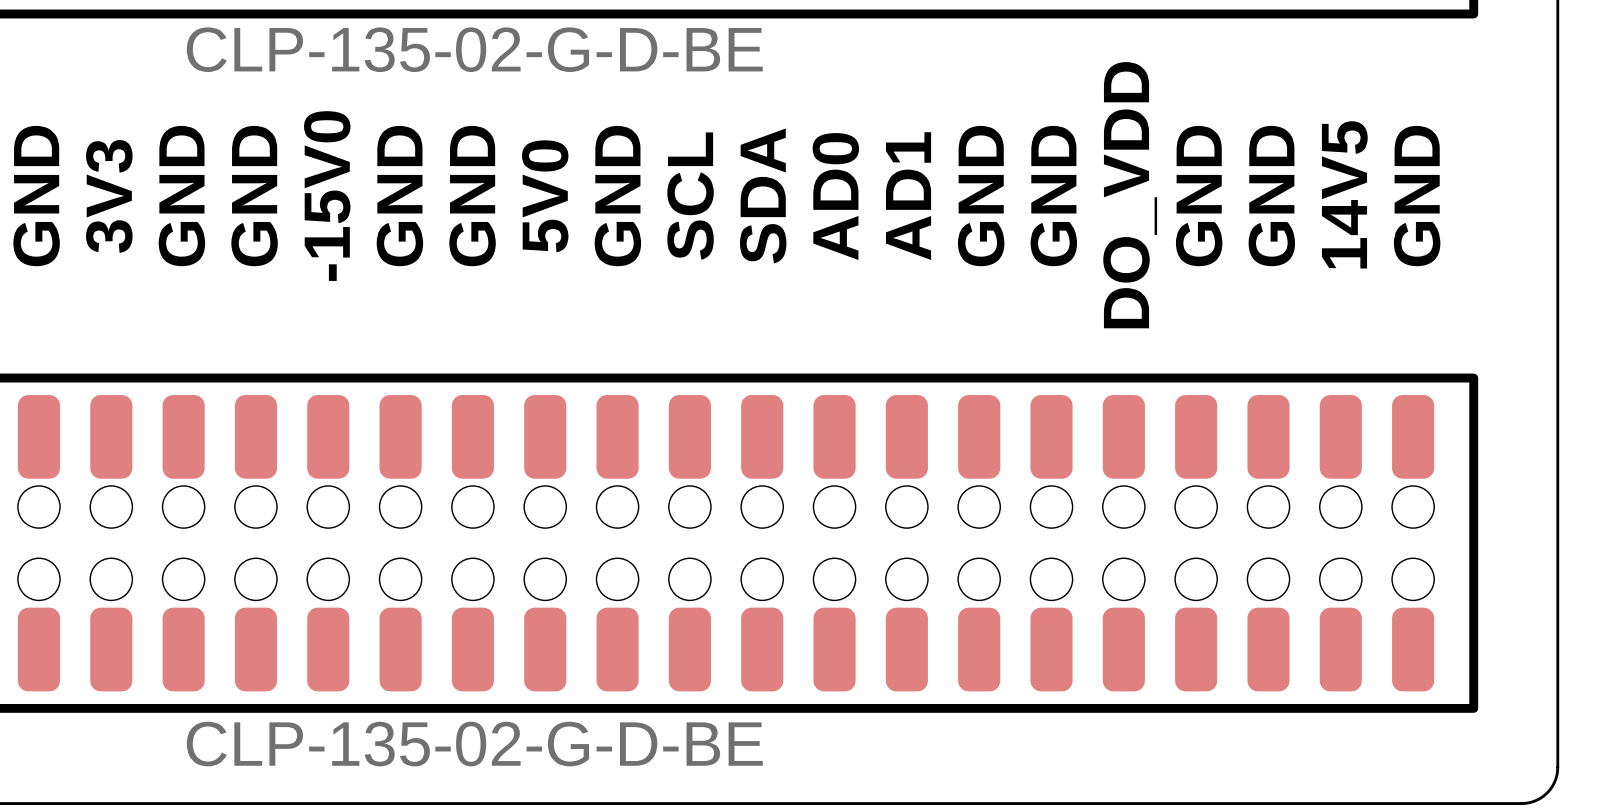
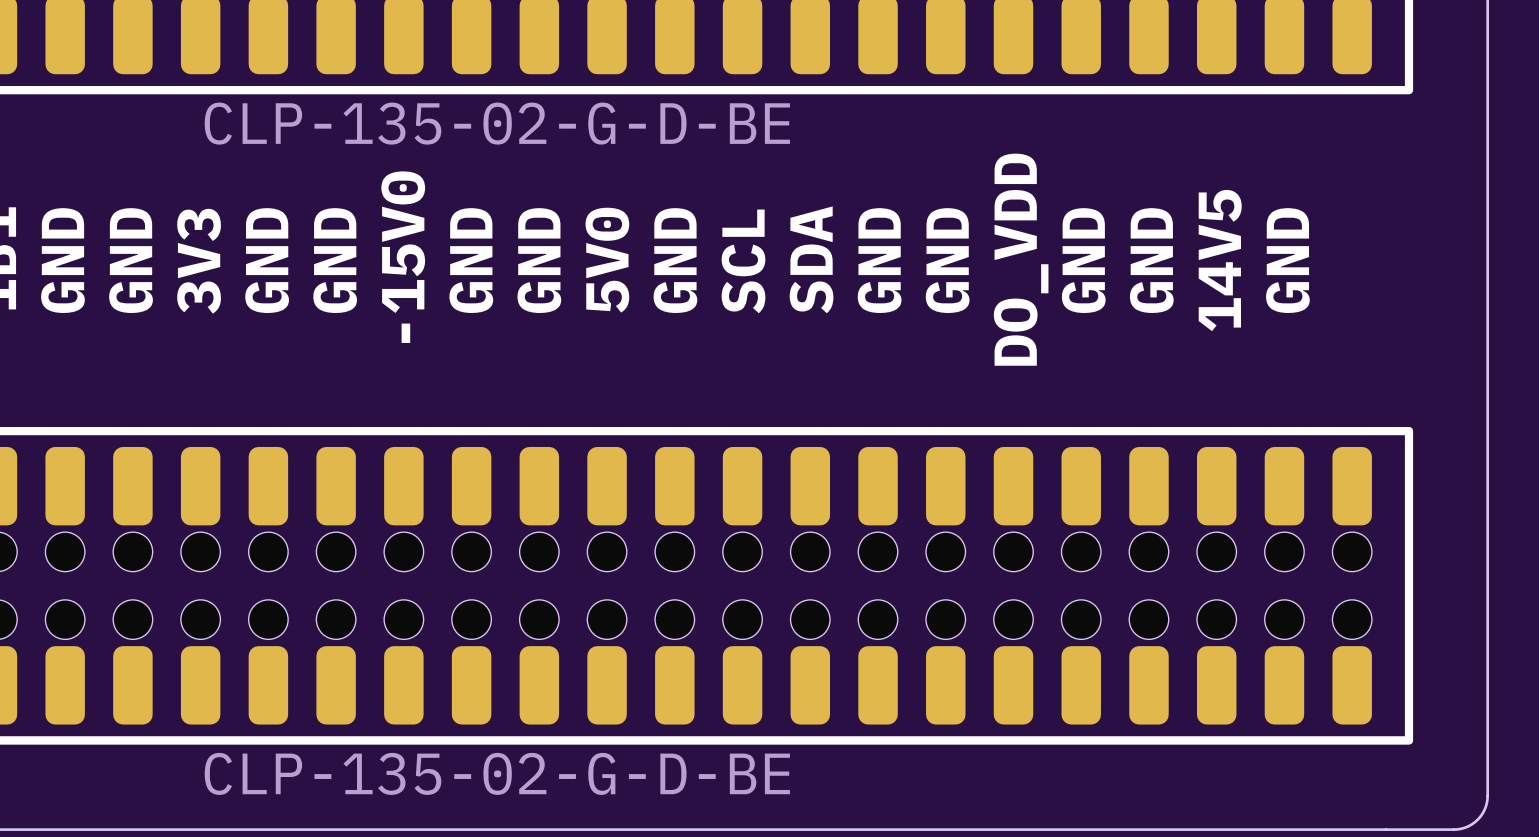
text: 14V5 (1344, 194) -> GND (1287, 260)
text: SDA (763, 195) -> SCL (743, 261)
text: DO_VDD (1130, 195) -> GND (1083, 260)
text: 3V3 (109, 196) -> GND (131, 260)
text: GND (181, 196) -> 3V3 (199, 261)
text: -15V0 (327, 196) -> GND (335, 260)
text: GND (399, 196) -> -15V0 (403, 257)
text: 5V0 (545, 196) -> GND (539, 260)
text: GND (617, 196) -> 5V0 (607, 260)
text: SCL (690, 196) -> GND (675, 260)
text: AD0 (835, 196) -> SDA (811, 259)
text: AD1 (908, 196) -> GND (879, 260)
text: GND (1053, 196) -> DO_VDD (1021, 259)
text: GND (1271, 196) -> 14V5 (1220, 260)
text: GND (1417, 196) -> none

